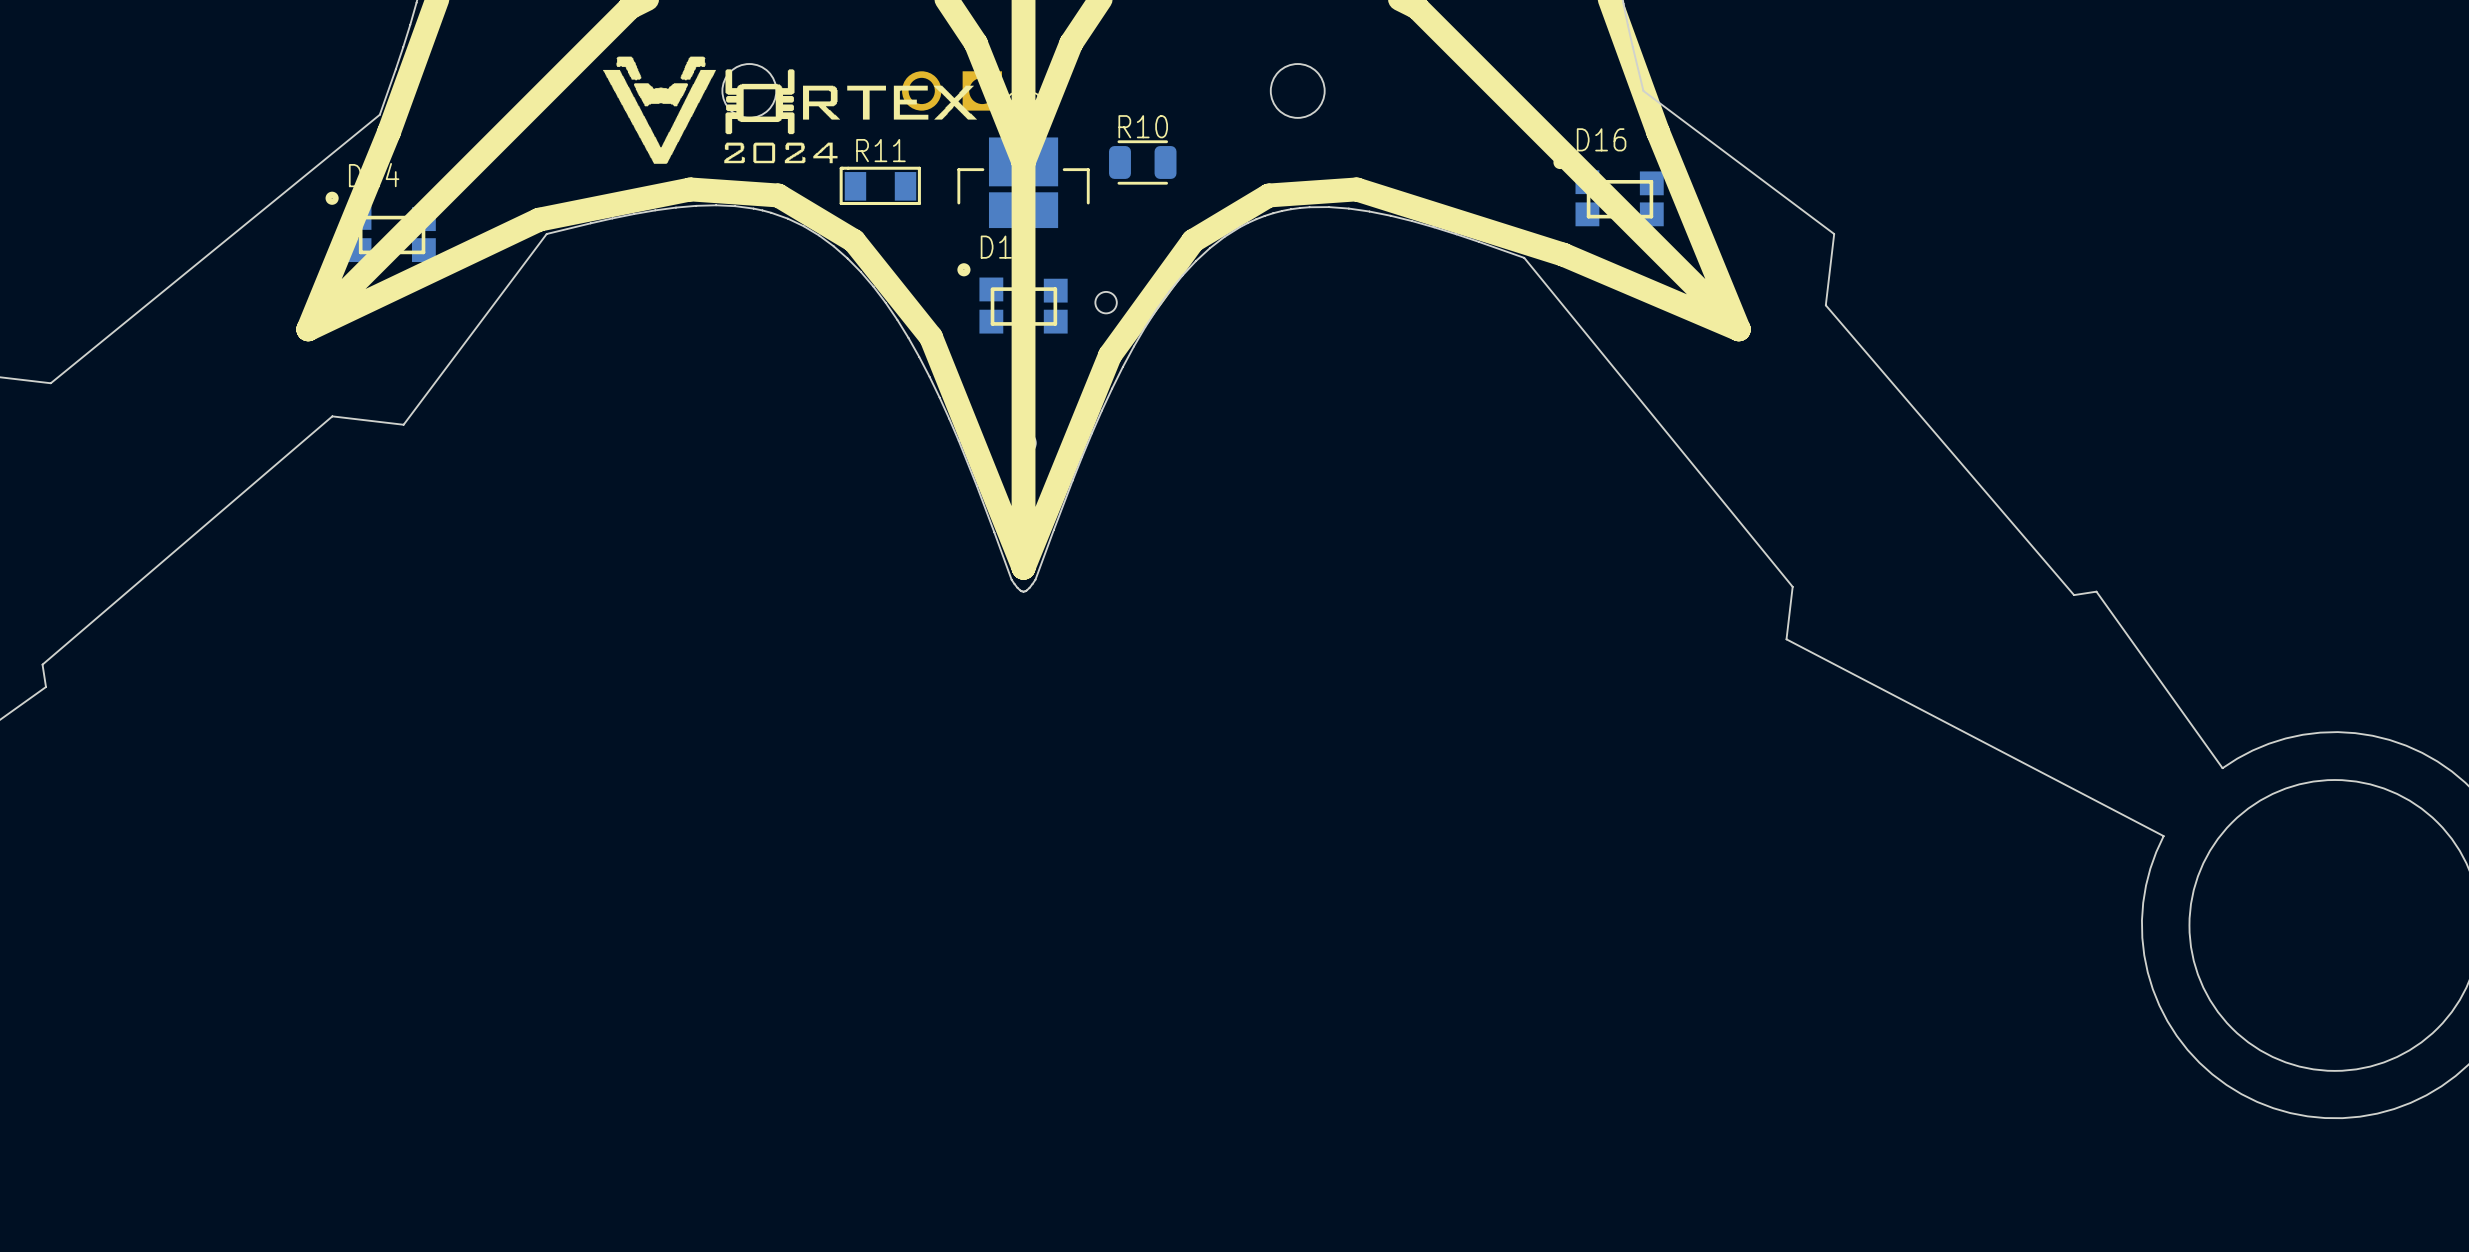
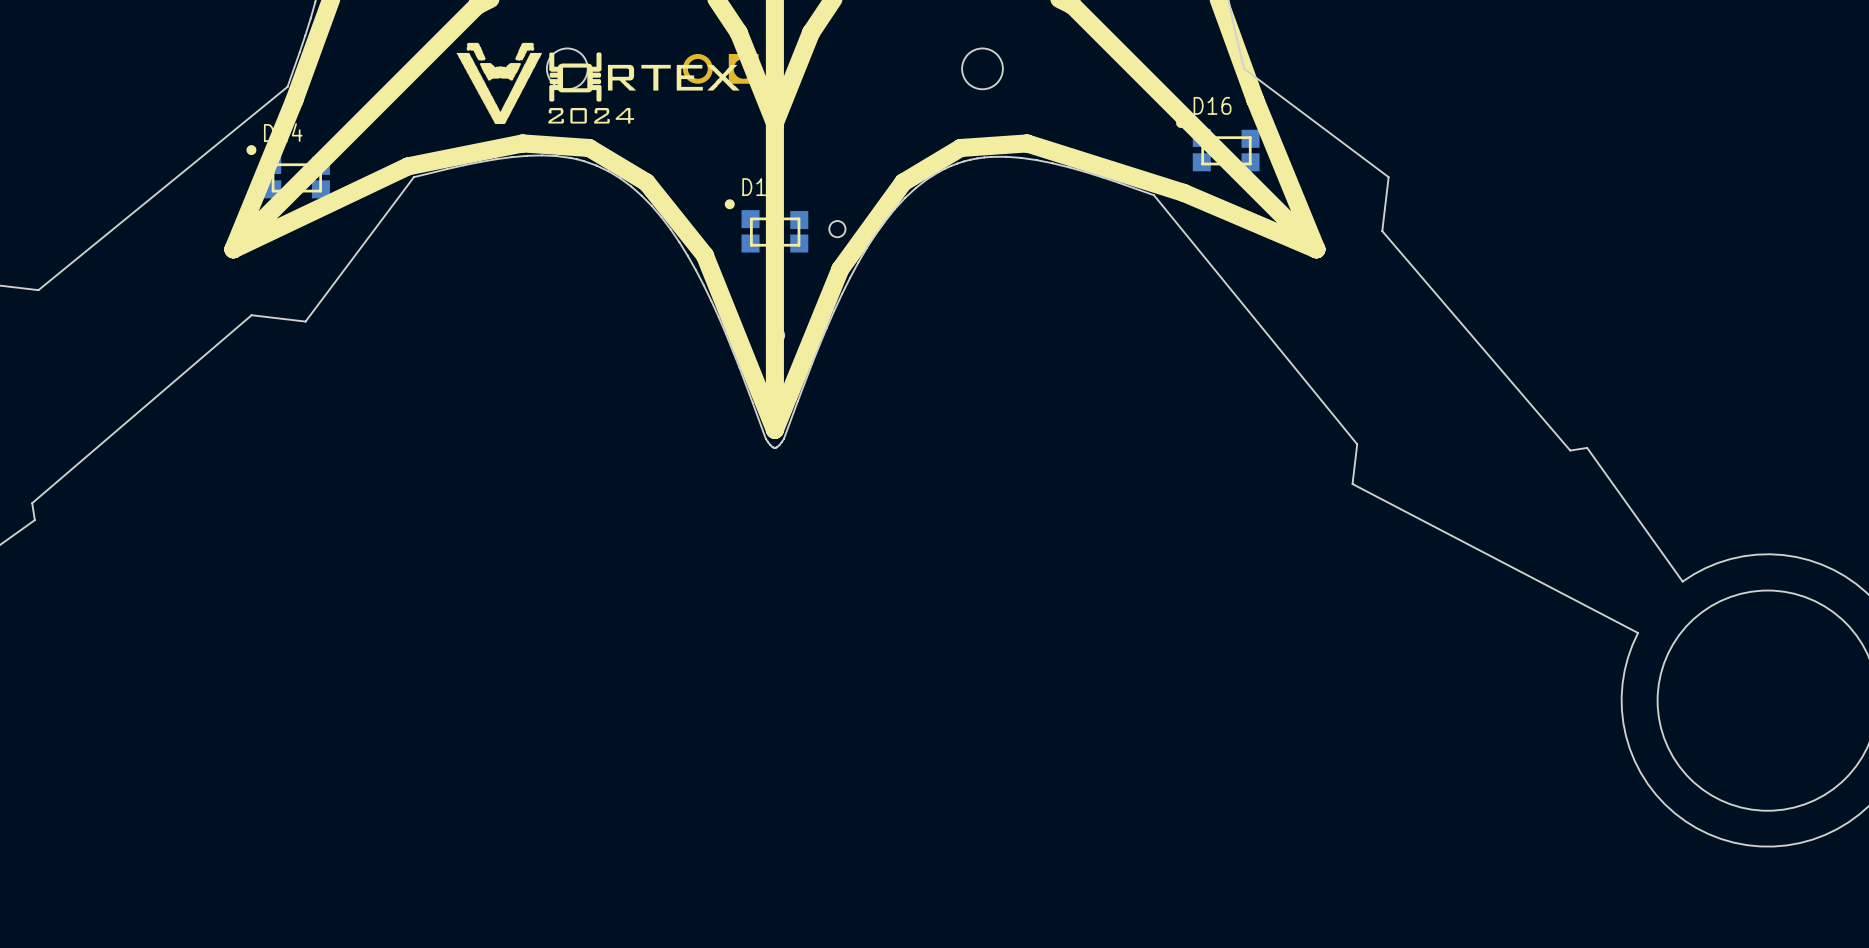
R10: (1142, 162) -> none
part: (1023, 182) -> none
R11: (880, 185) -> none

